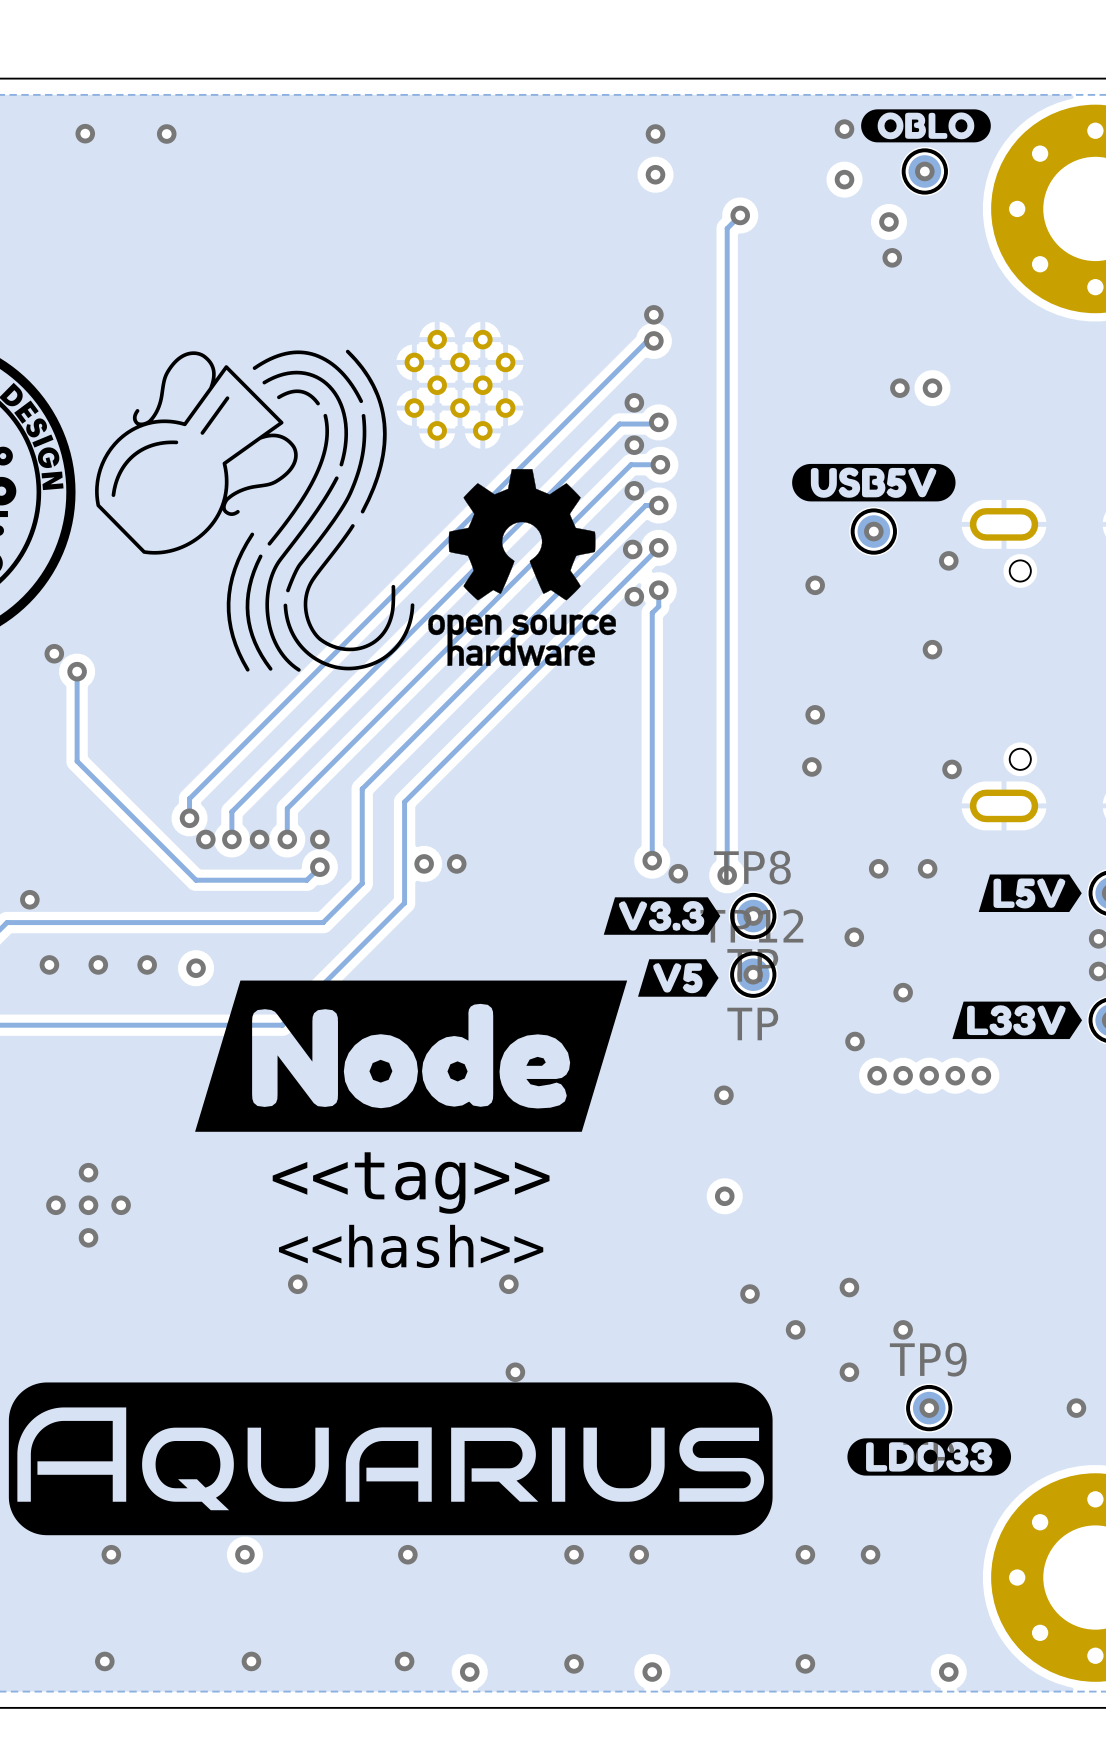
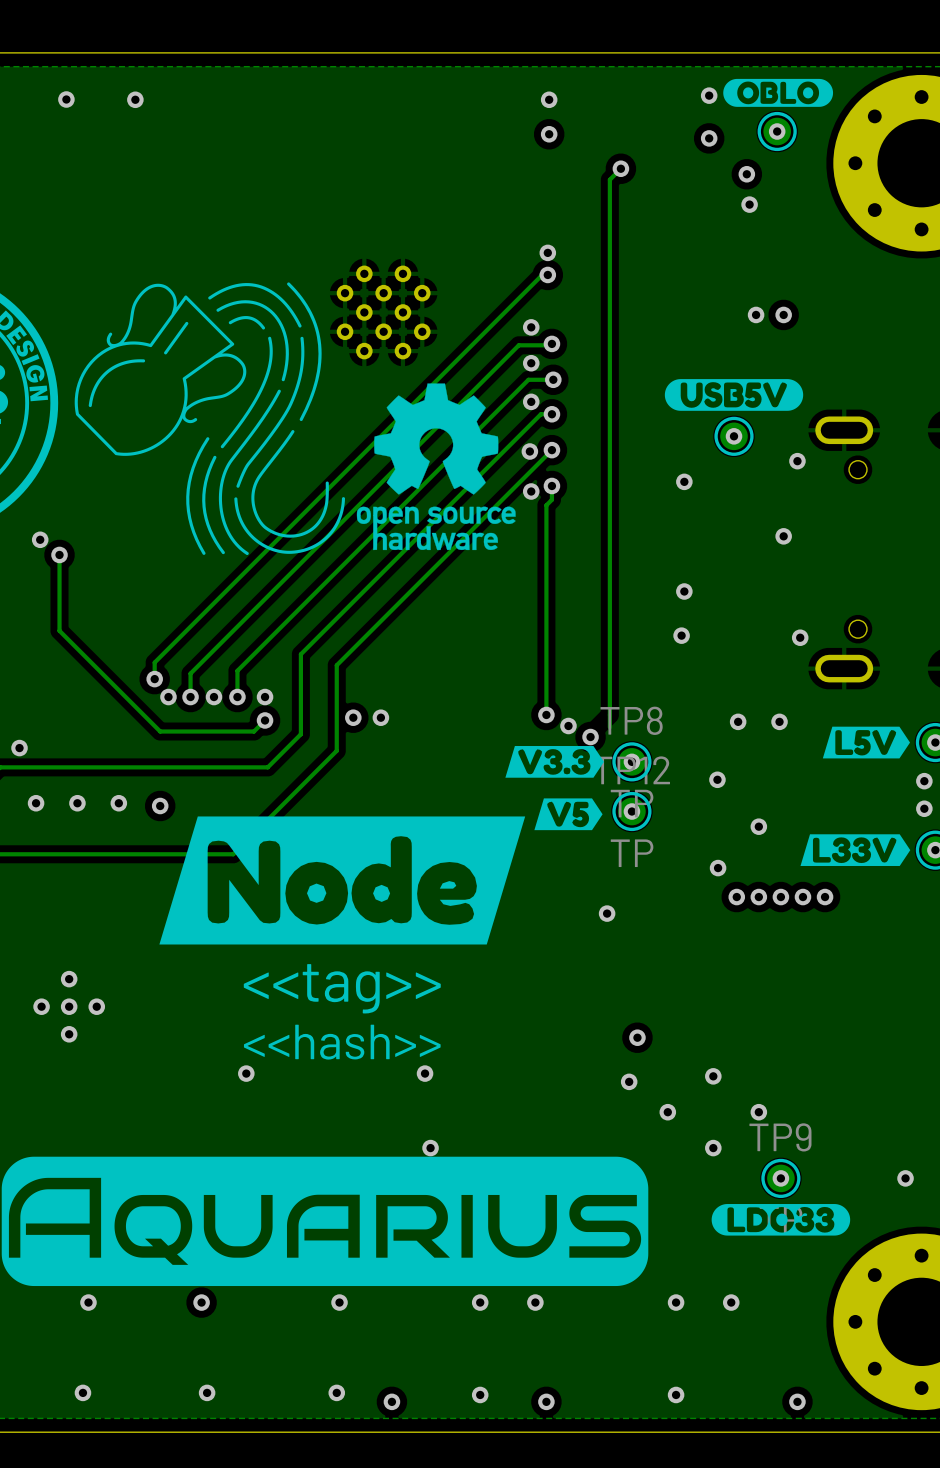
via position: (727, 875) -> (590, 737)
via position: (724, 1196) -> (637, 1037)

